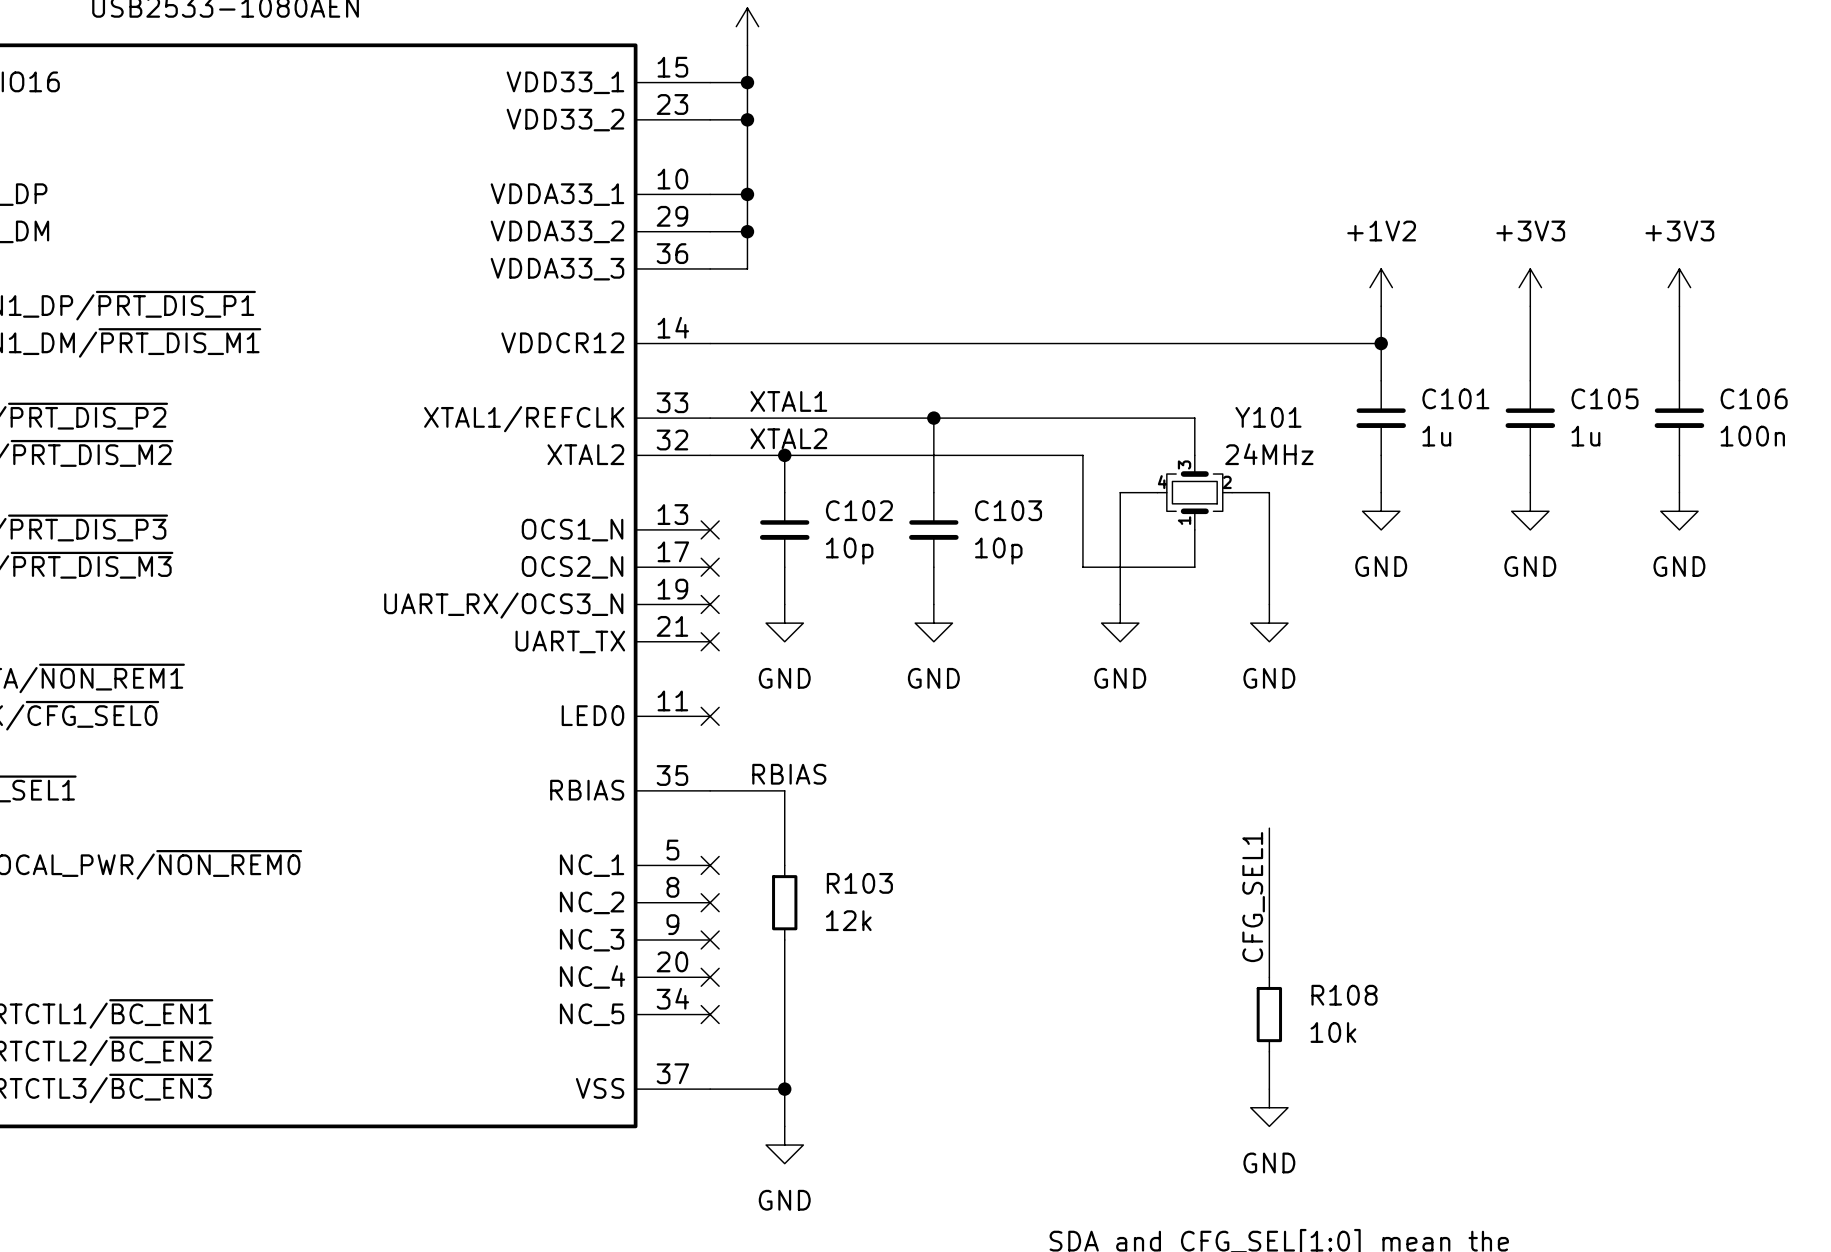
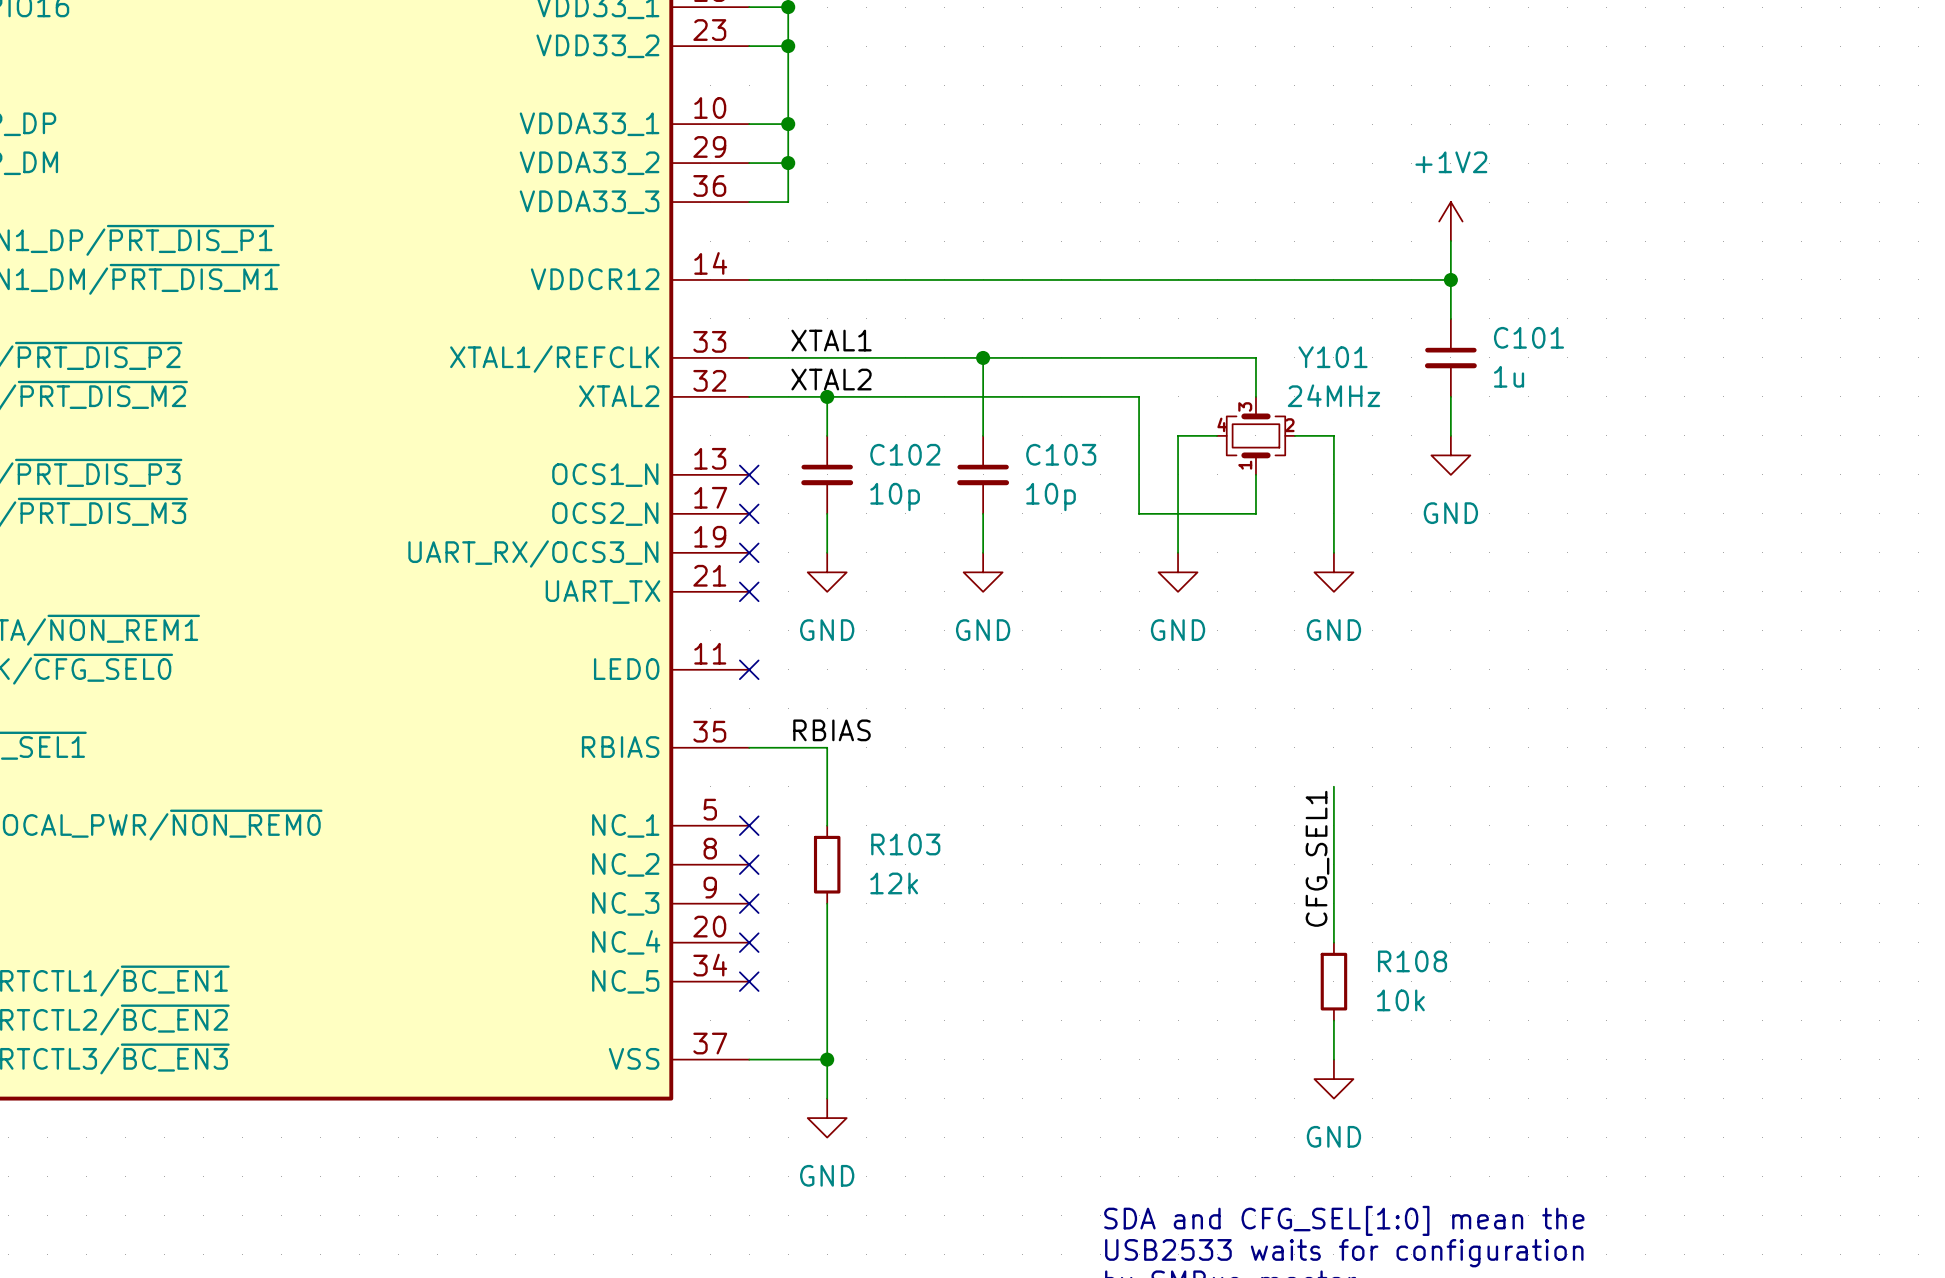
power symbol: +3V3 (1530, 287) -> none
power symbol: +3V3 (1679, 287) -> none
wire: (1530, 306) (1530, 380) -> none
wire: (1679, 306) (1679, 380) -> none
C105: 1u (1530, 418) -> none
C106: 100n (1679, 418) -> none
wire: (1530, 455) (1530, 492) -> none
wire: (1679, 455) (1679, 492) -> none
power symbol: GND (1530, 511) -> none
power symbol: GND (1679, 511) -> none

